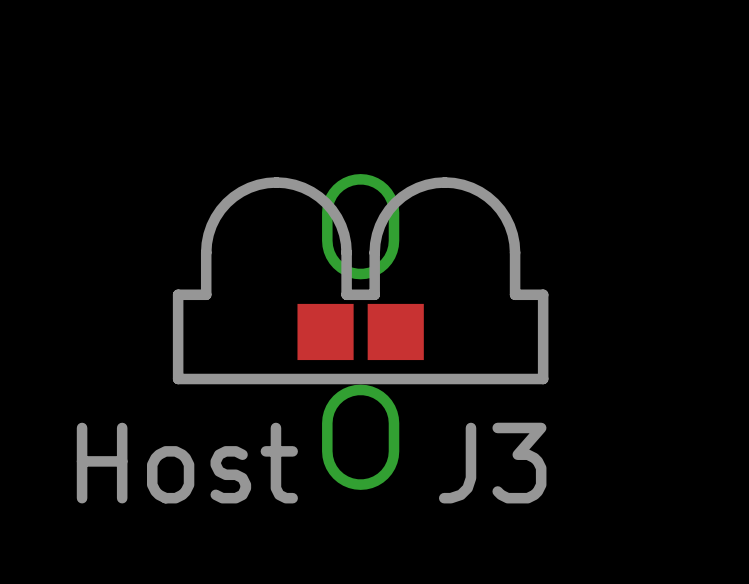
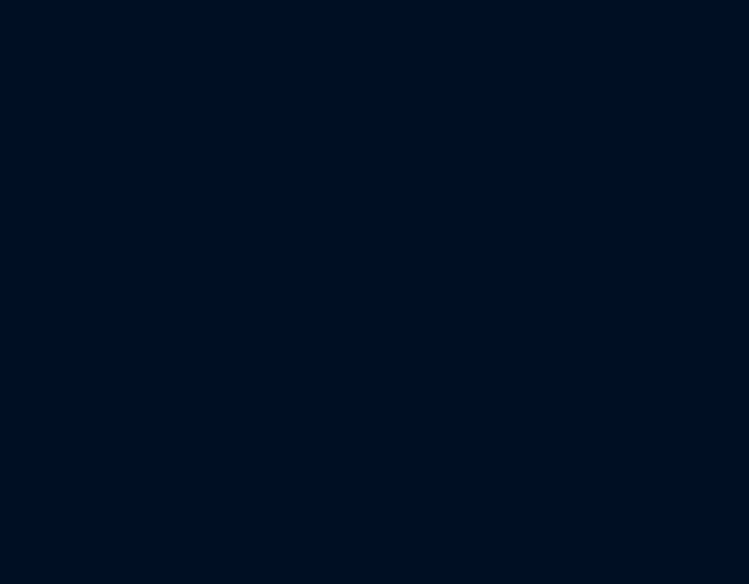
J3: Host (360, 331) -> none

